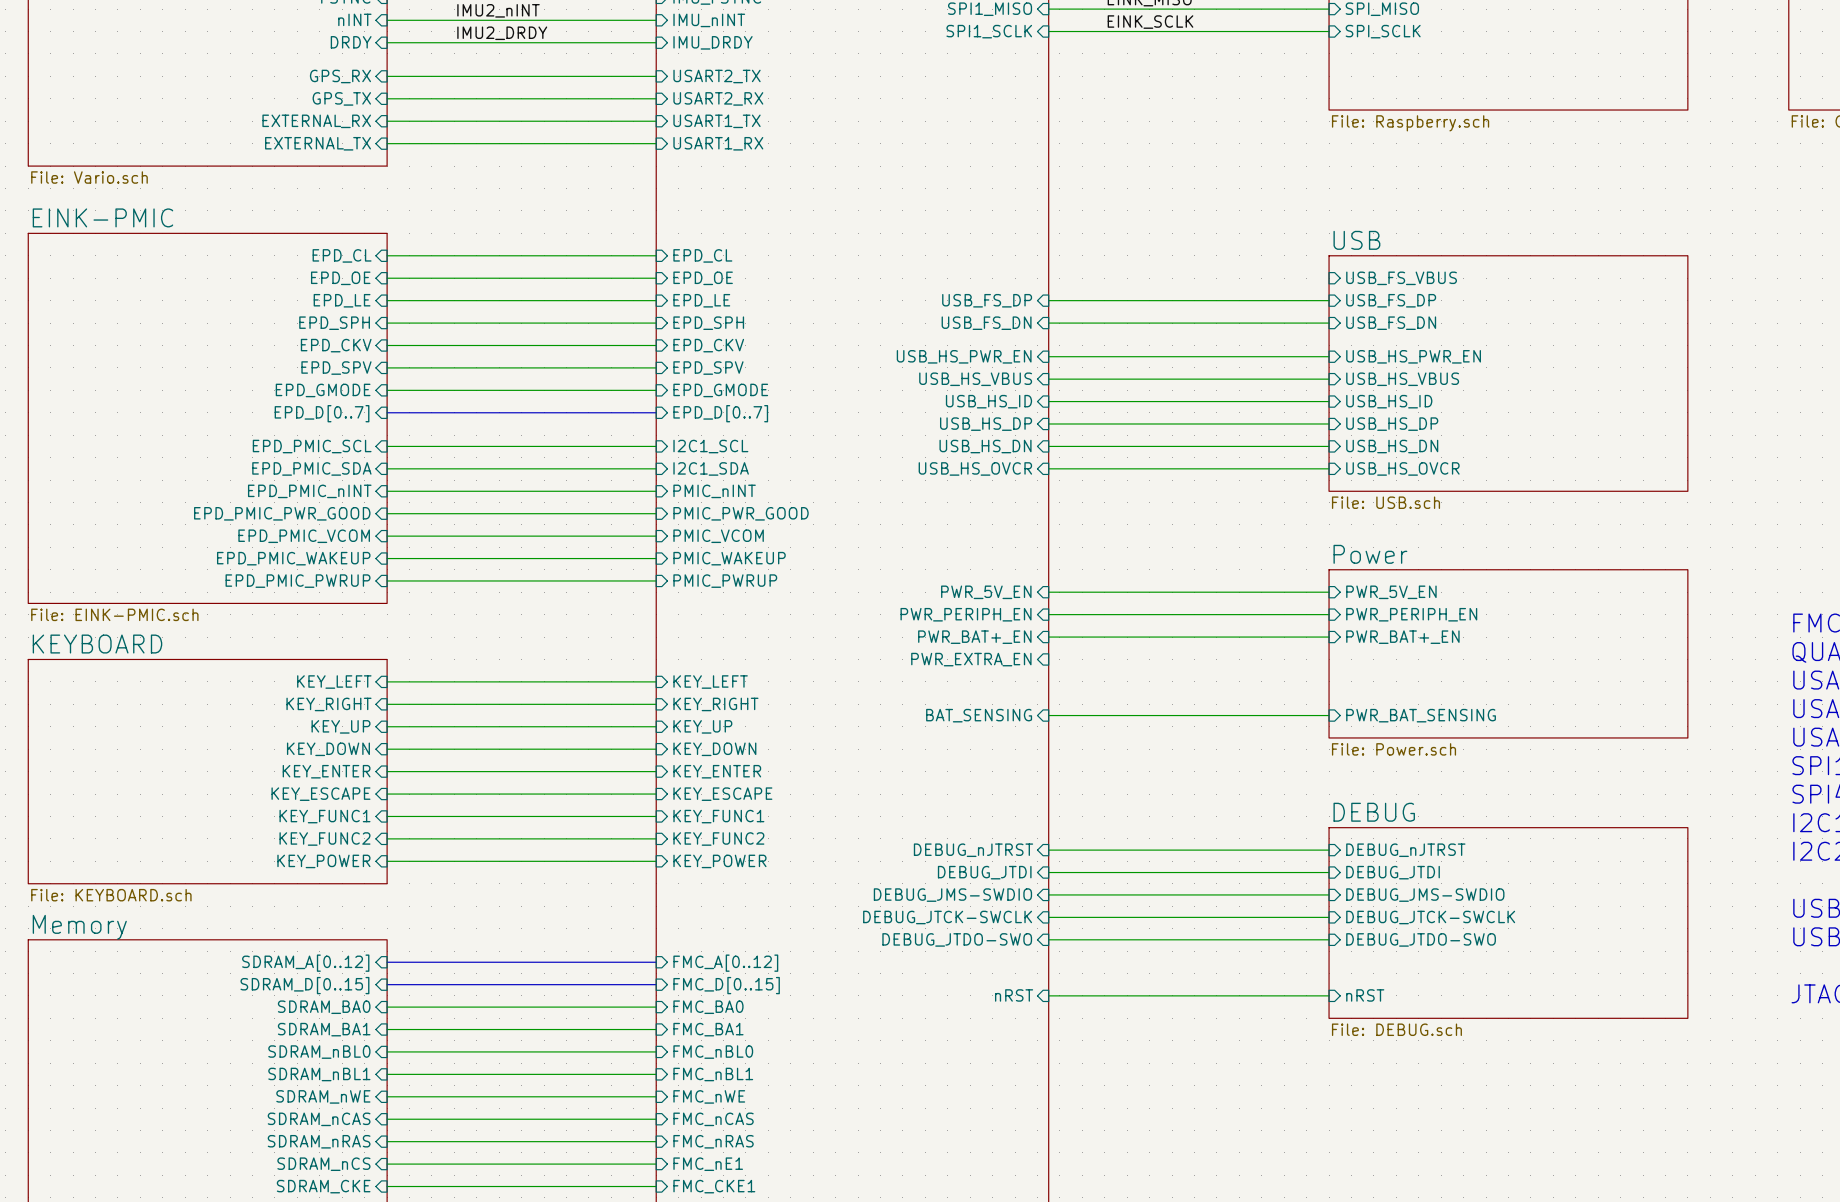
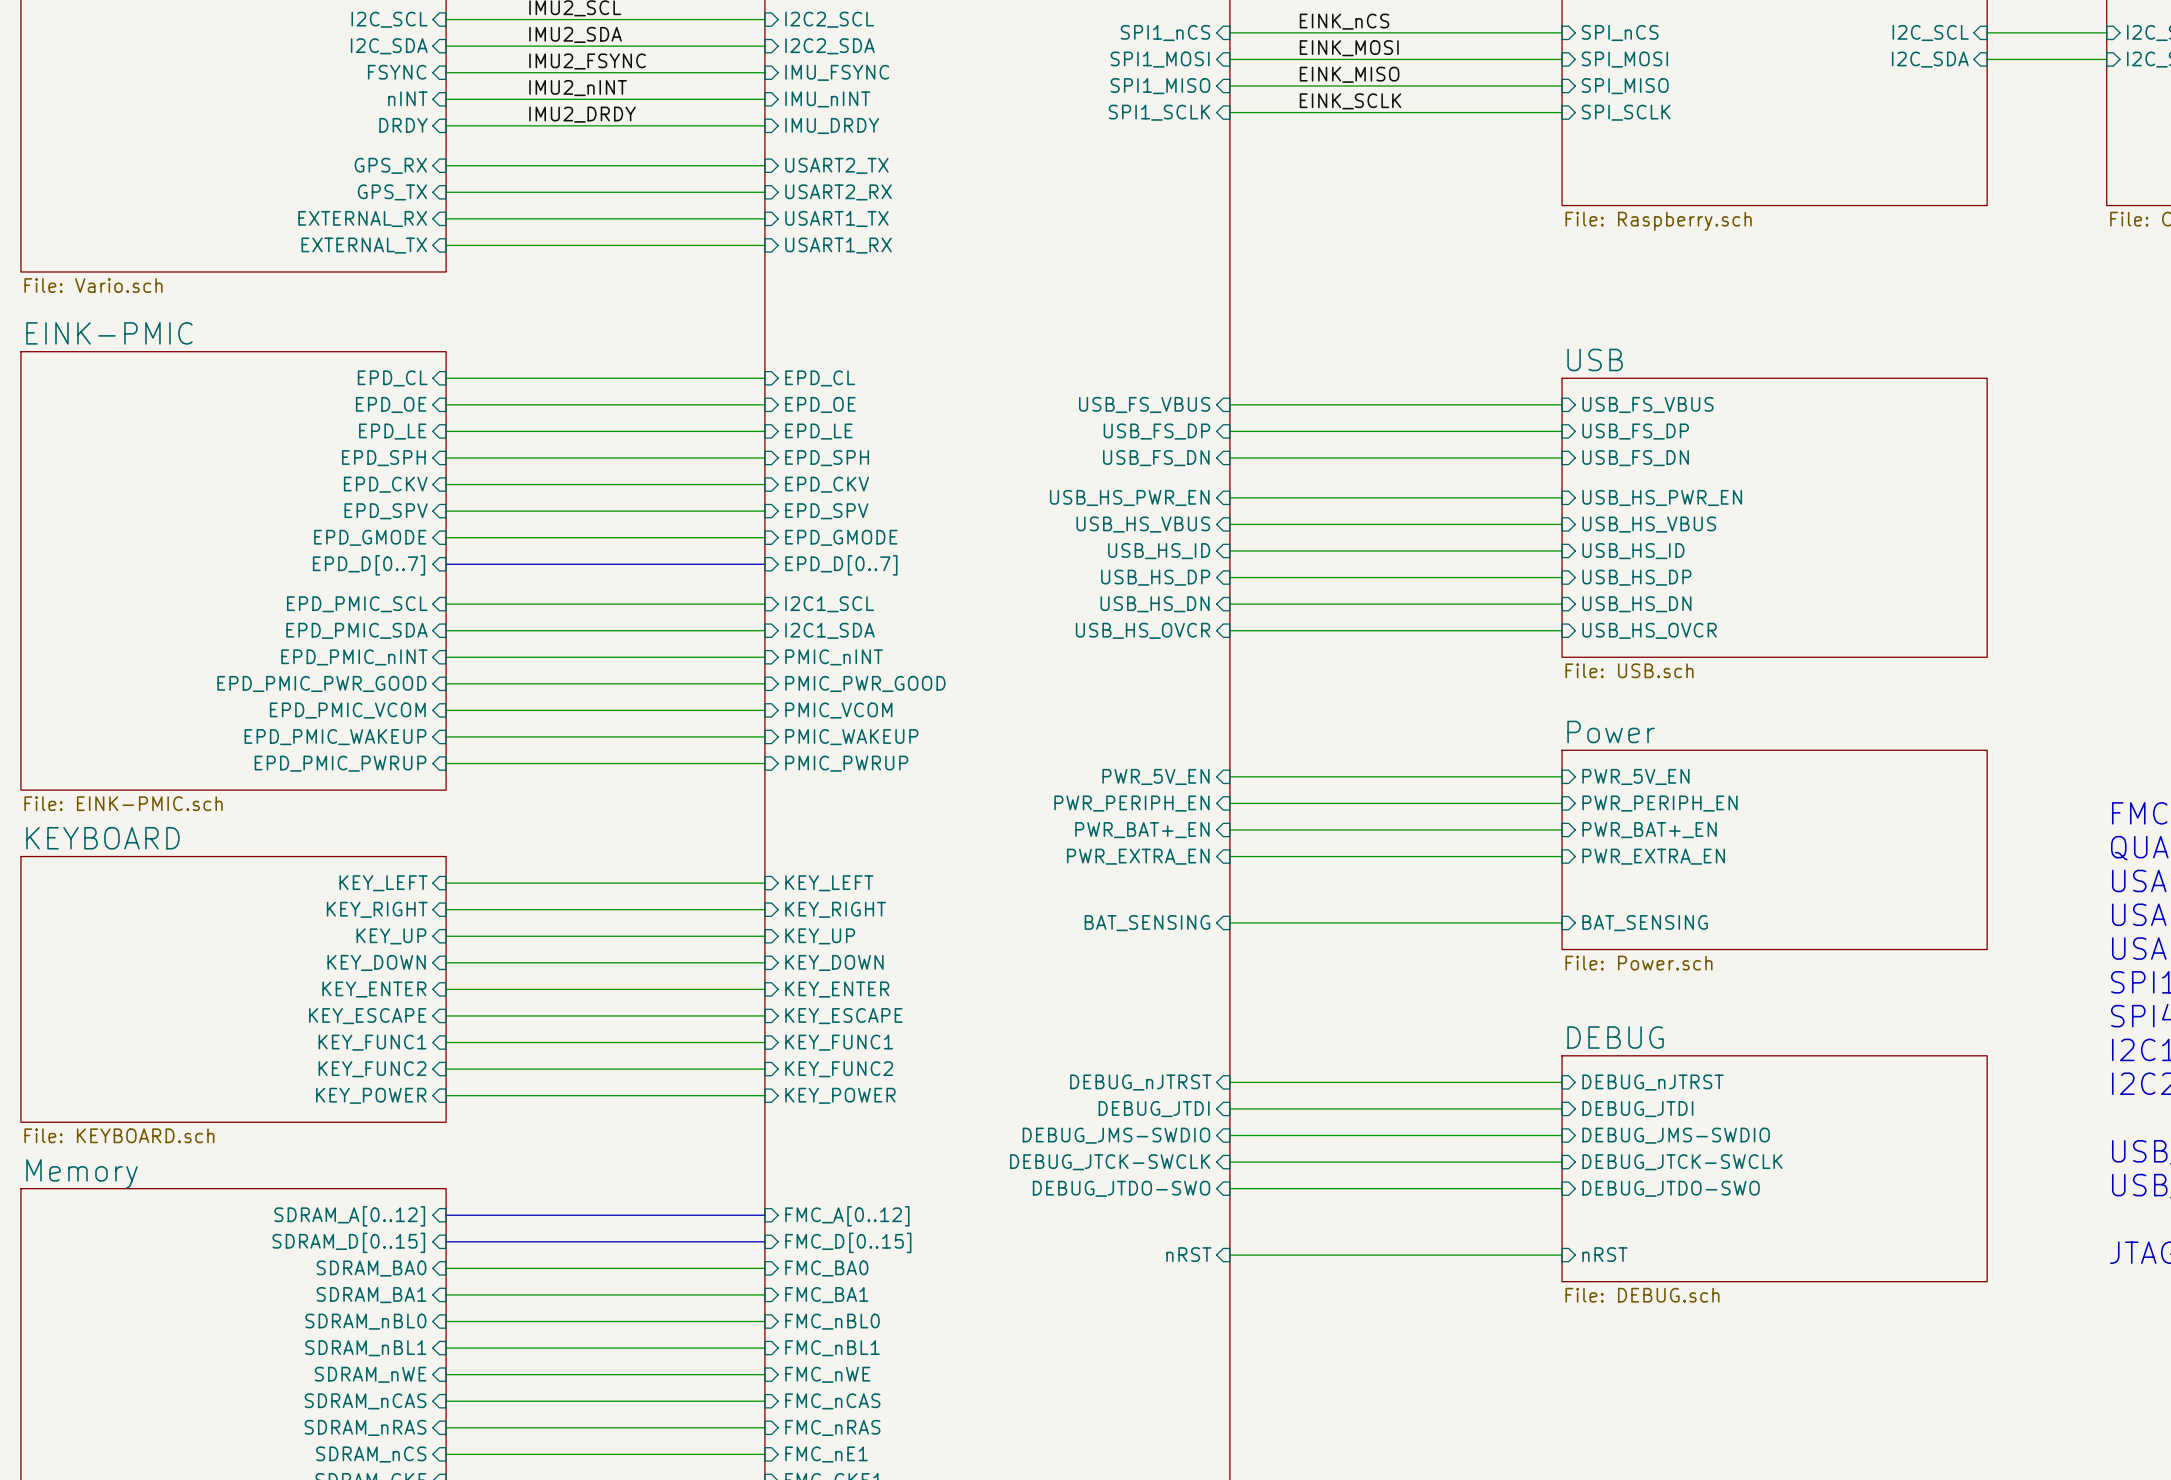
sheet pin: none -> USB_FS_VBUS (1144, 404)
wire: none -> (1229, 404) (1562, 404)
wire: none -> (1229, 856) (1562, 856)
sheet pin: none -> PWR_EXTRA_EN (1653, 856)
sheet pin: PWR_BAT_SENSING (1421, 715) -> BAT_SENSING (1645, 923)

